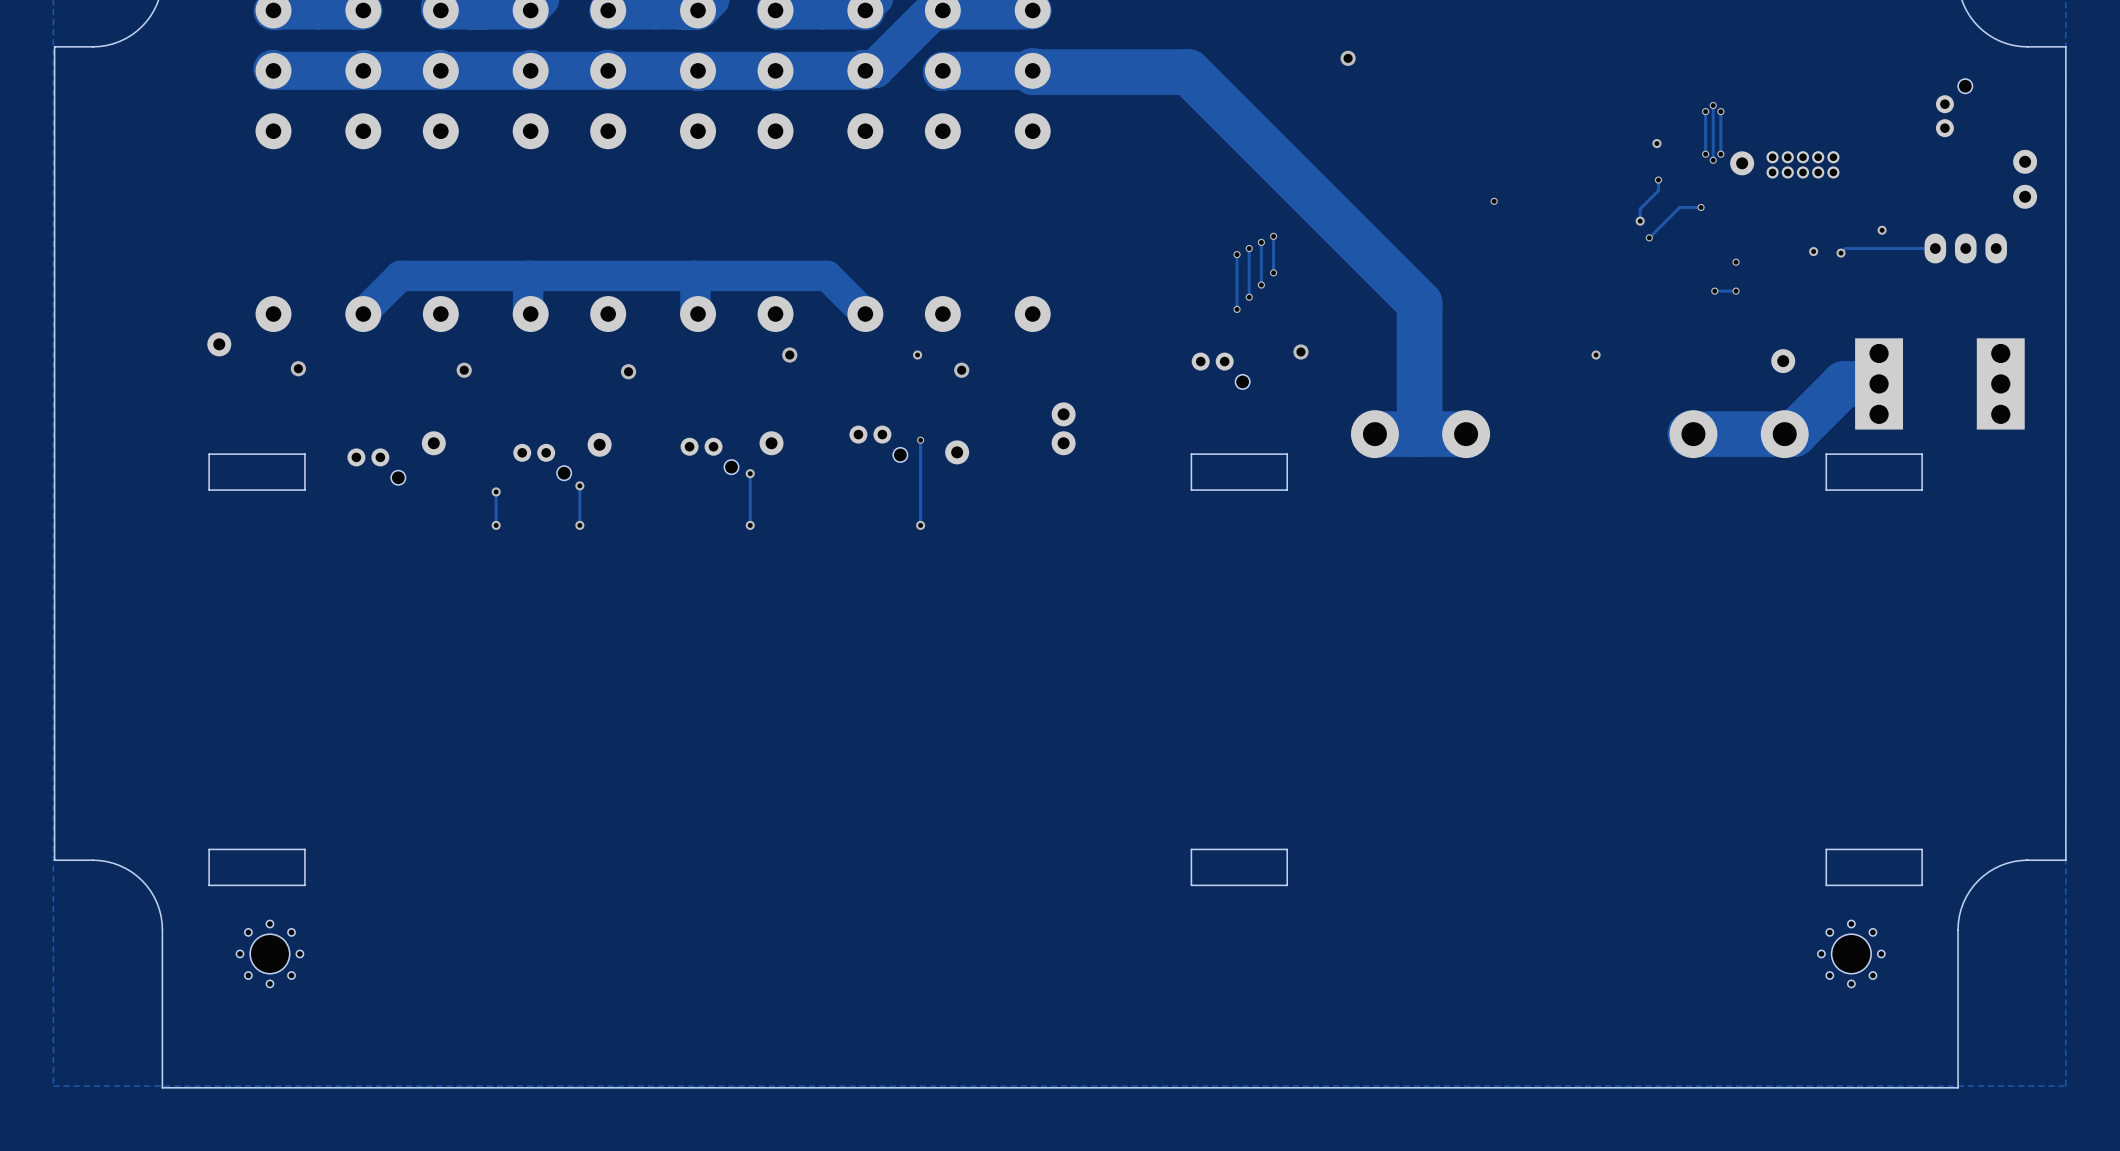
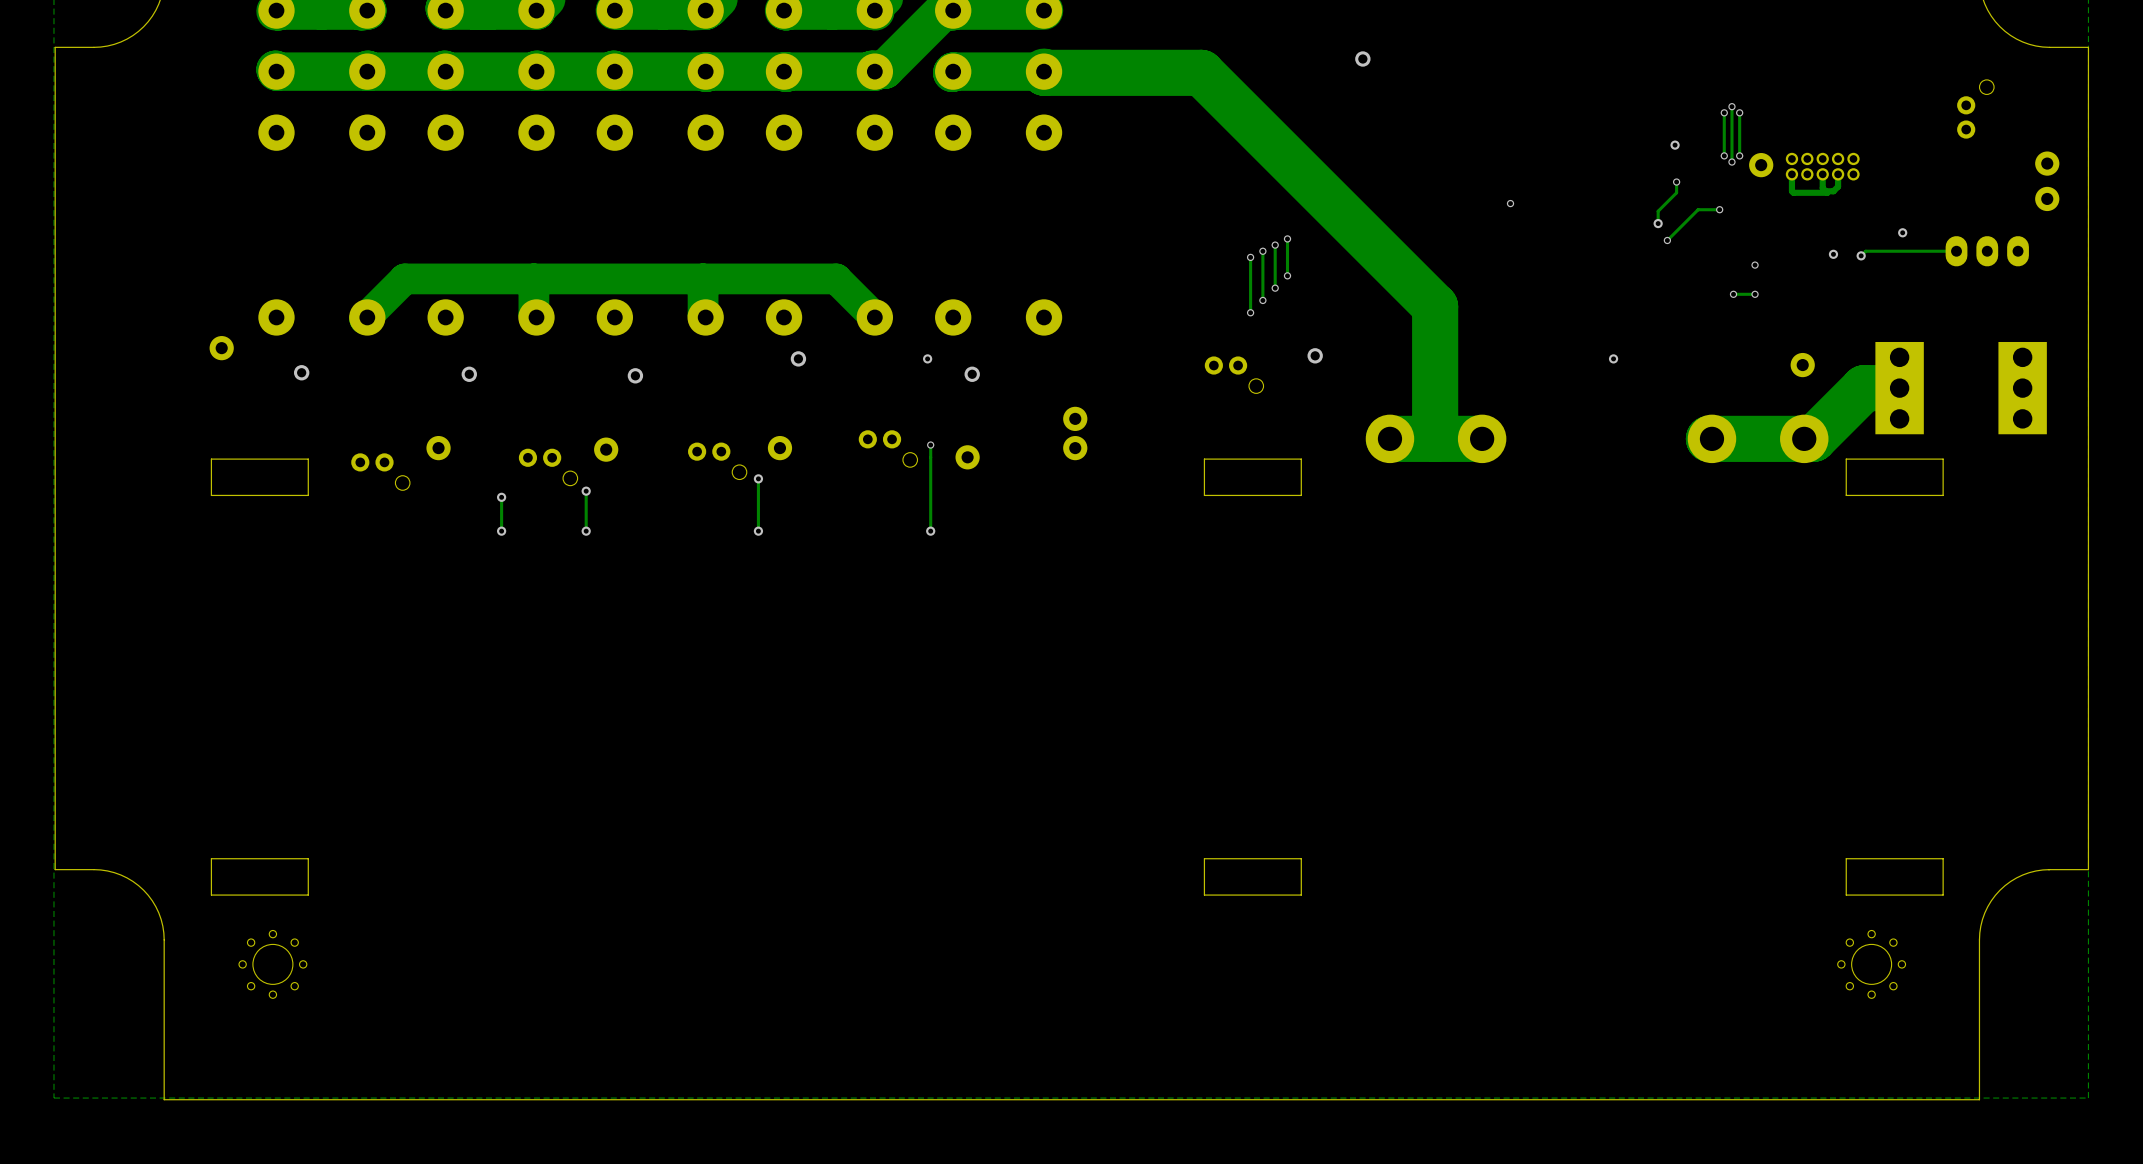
track: none -> (1822, 174) (1822, 188) (1827, 192) (1793, 192) (1791, 174)
track: none -> (1838, 174) (1838, 186) (1833, 191) (1825, 191)

